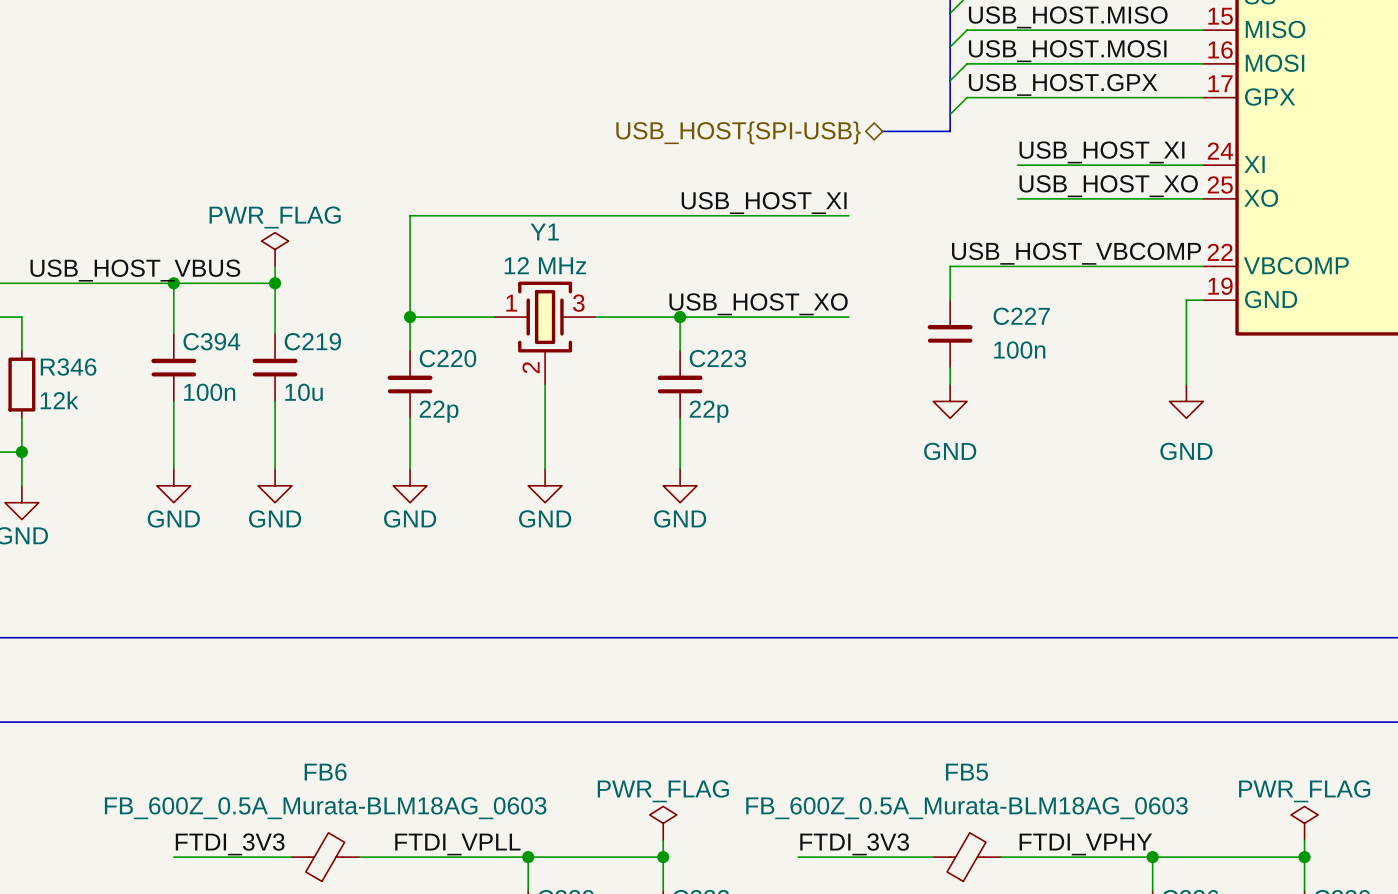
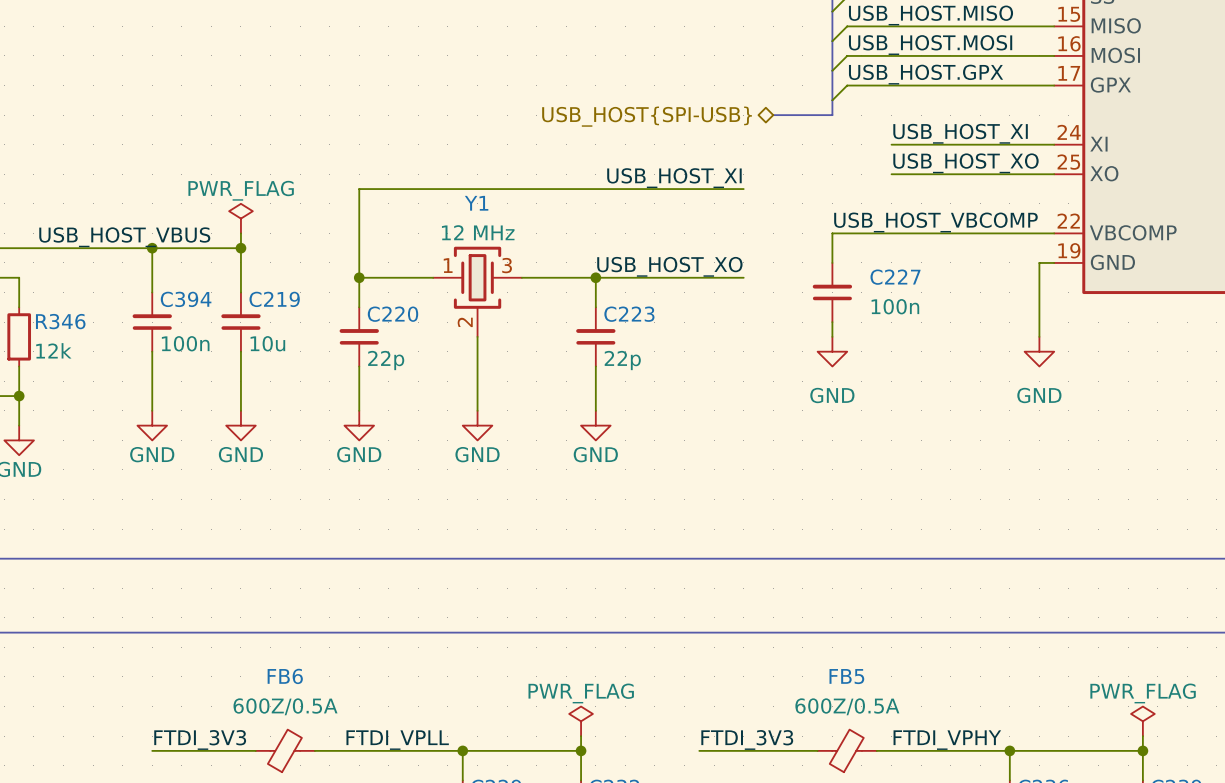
FB6 text: none -> 600Z/0.5A (285, 706)
FB5 text: none -> 600Z/0.5A (847, 706)
FB6 value: FB_600Z_0.5A_Murata-BLM18AG_0603 (325, 808) -> none
FB5 value: FB_600Z_0.5A_Murata-BLM18AG_0603 (966, 808) -> none

